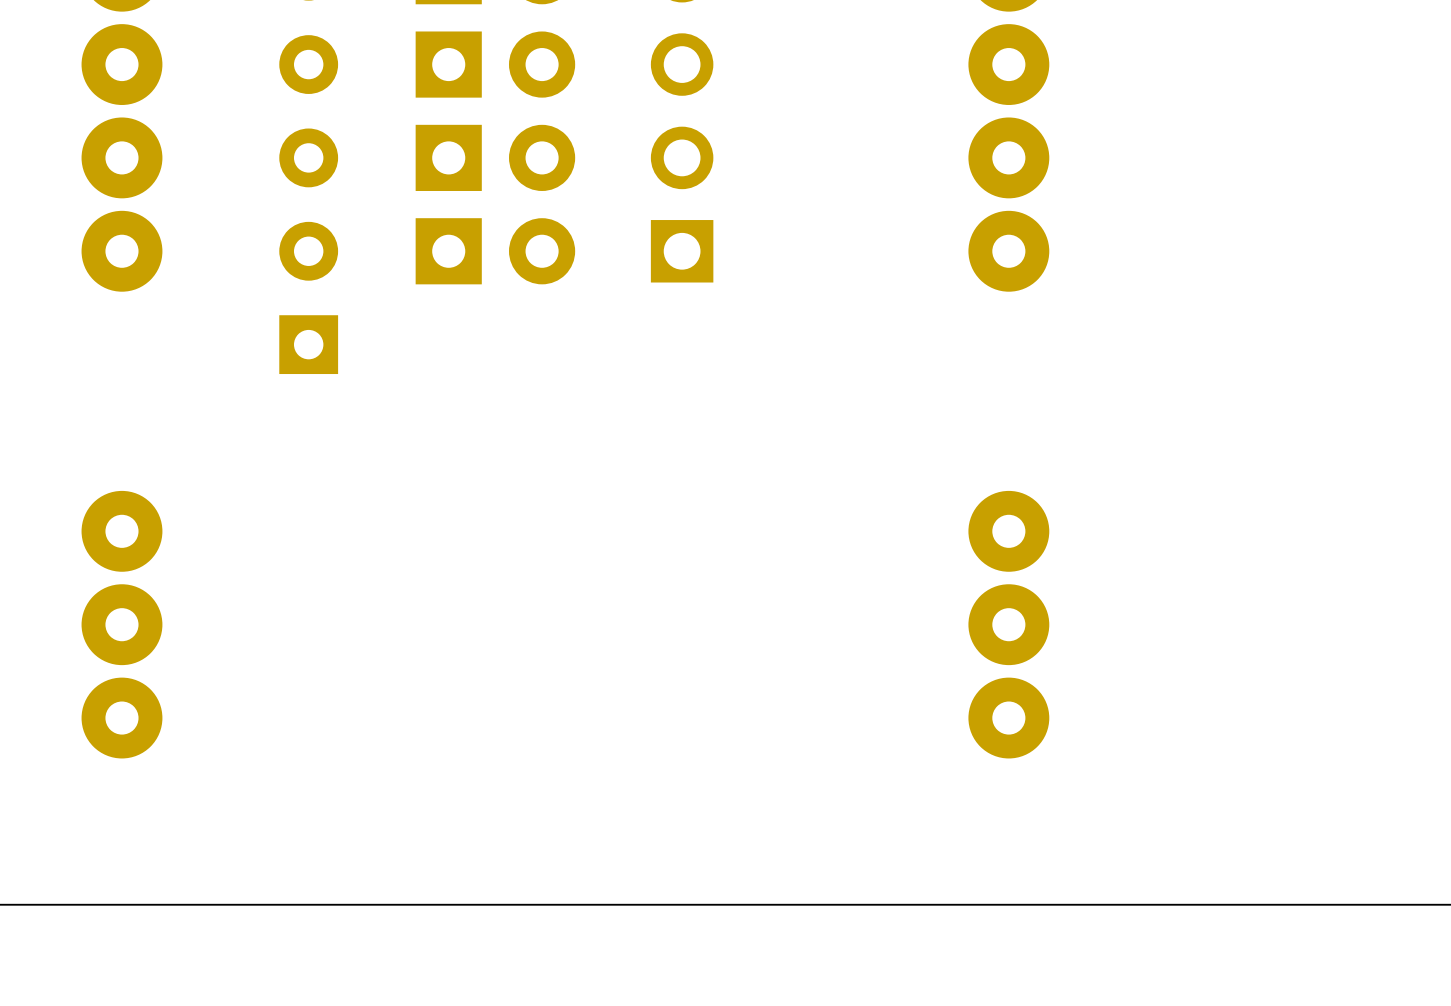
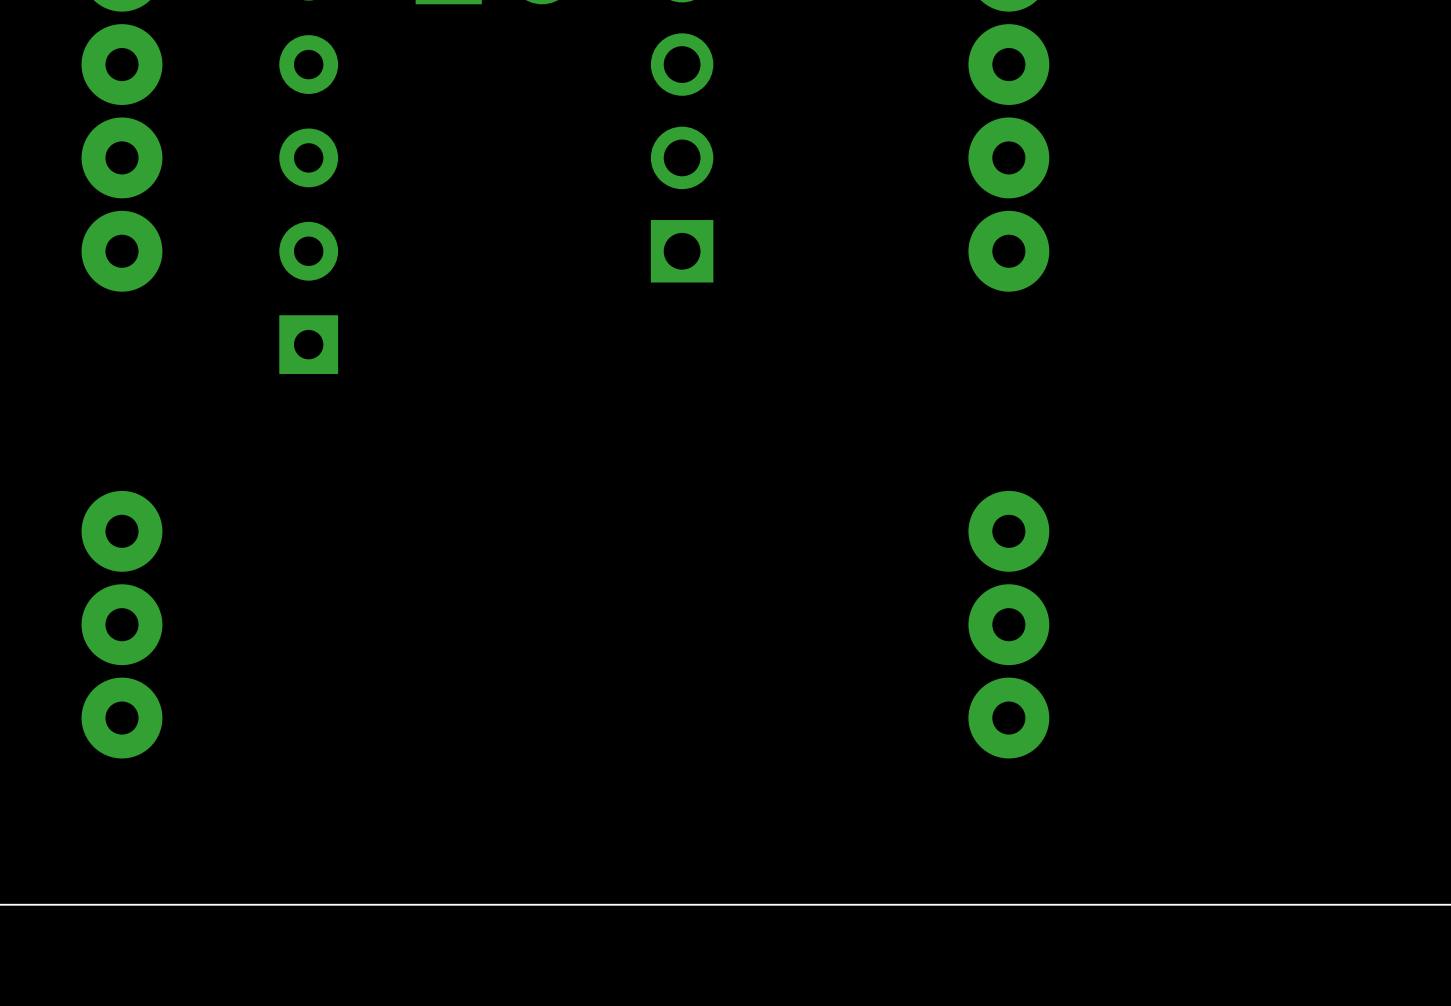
part: (495, 64) -> none
part: (495, 157) -> none
part: (495, 251) -> none

